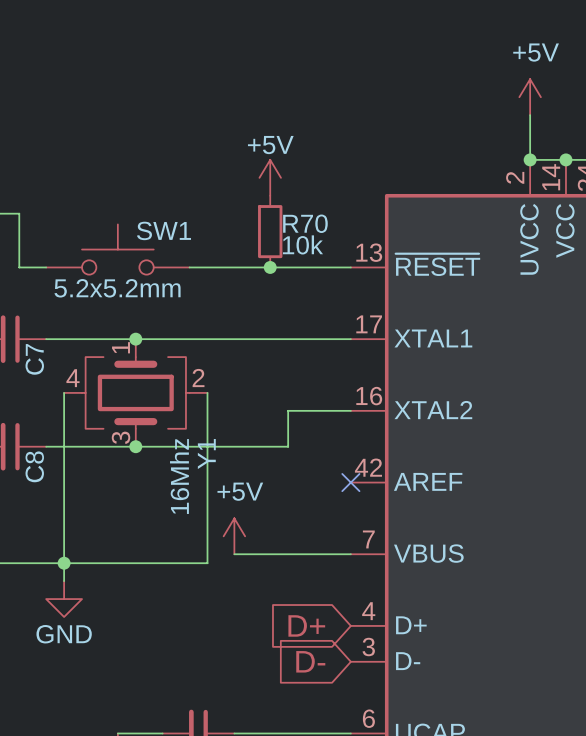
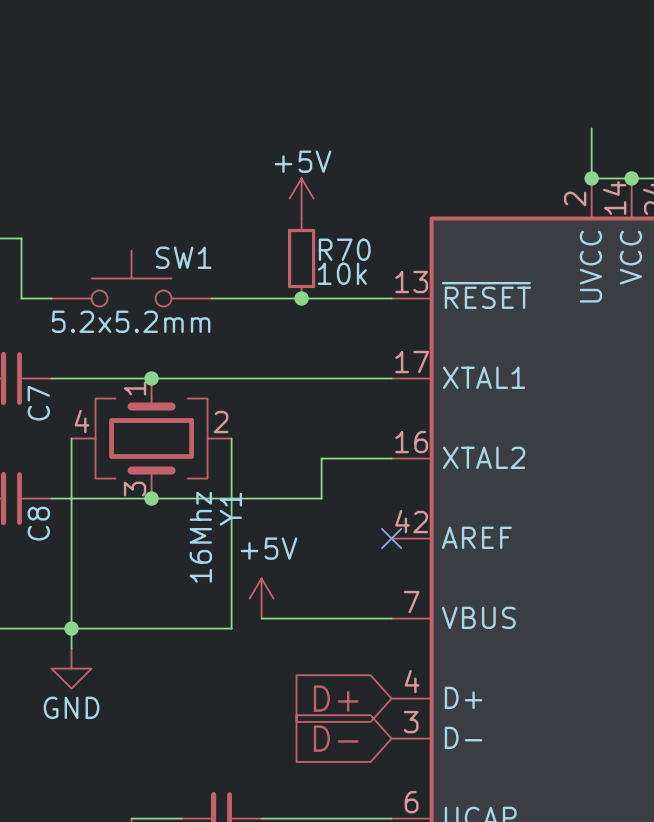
power symbol: +5V (530, 97) -> none

